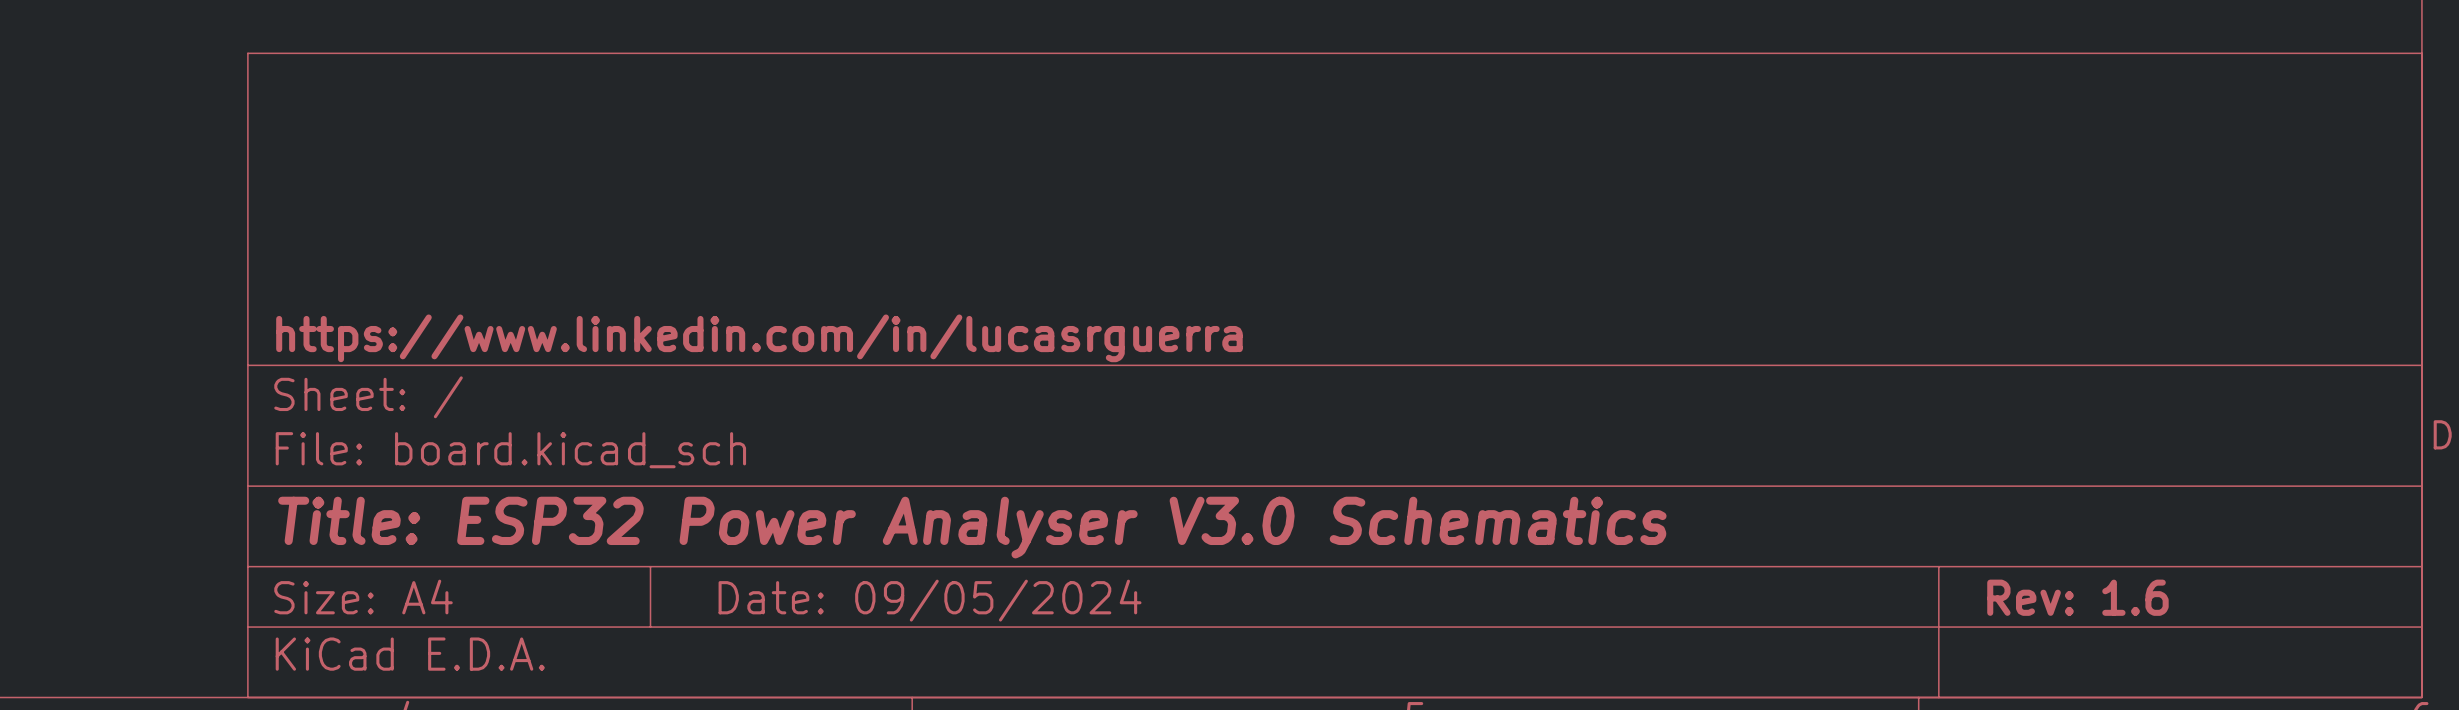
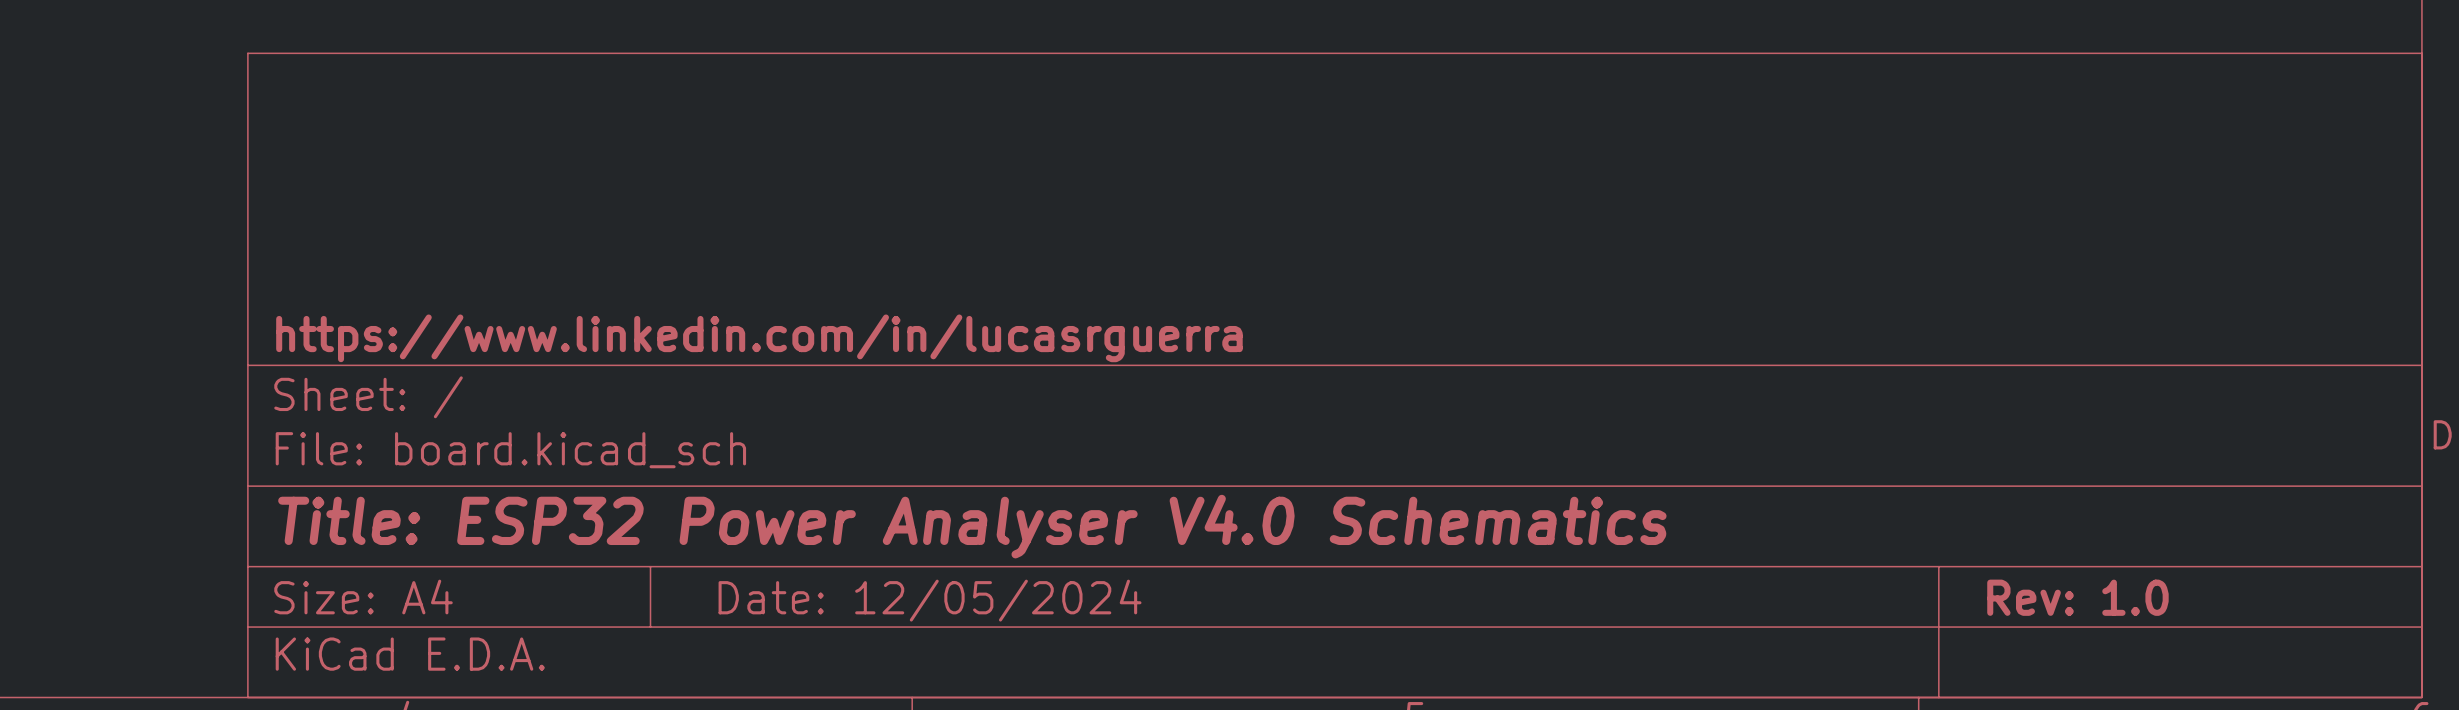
title block: Title: ESP32 Power Analyser V3.0 Schematics (972, 527) -> Title: ESP32 Power Analyser V4.0 Schematics (972, 526)
title block: Rev: 1.6 (2077, 597) -> Rev: 1.0 (2077, 597)
title block: Date: 09/05/2024 (930, 600) -> Date: 12/05/2024 (930, 600)

